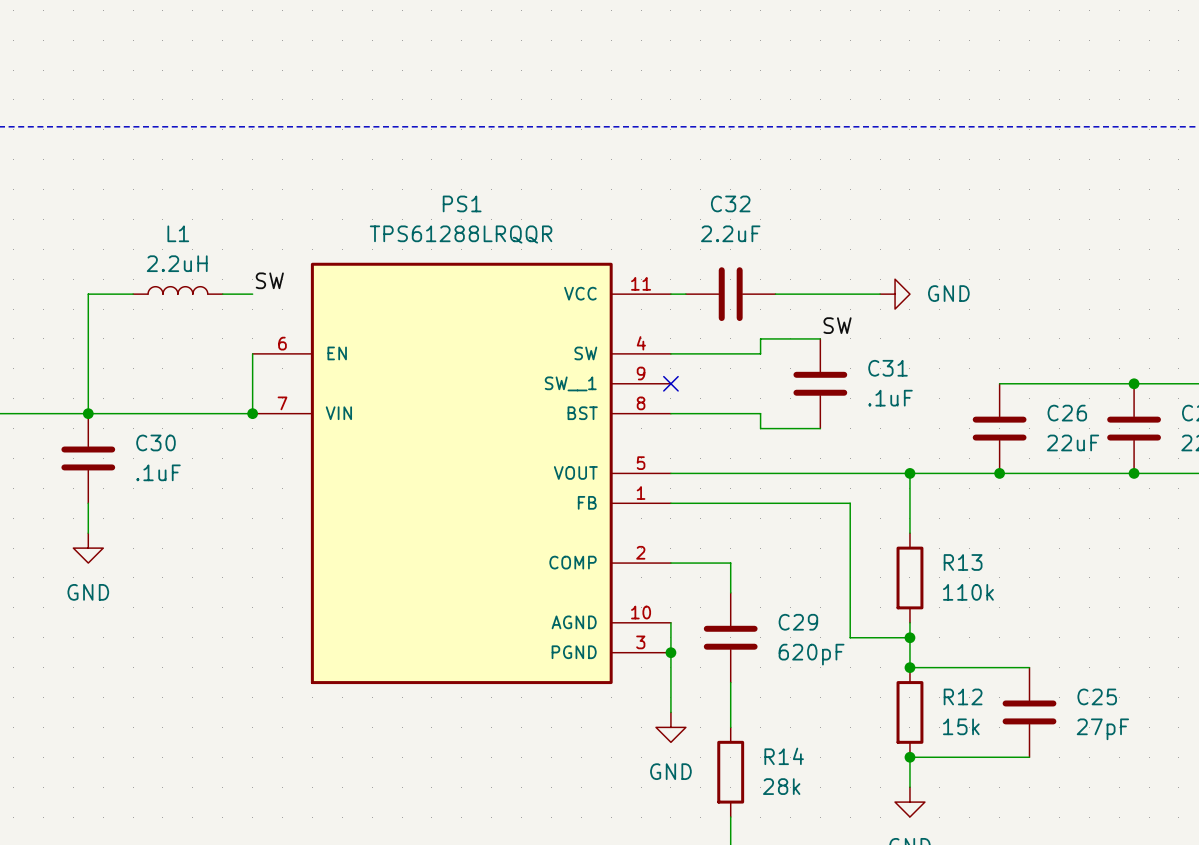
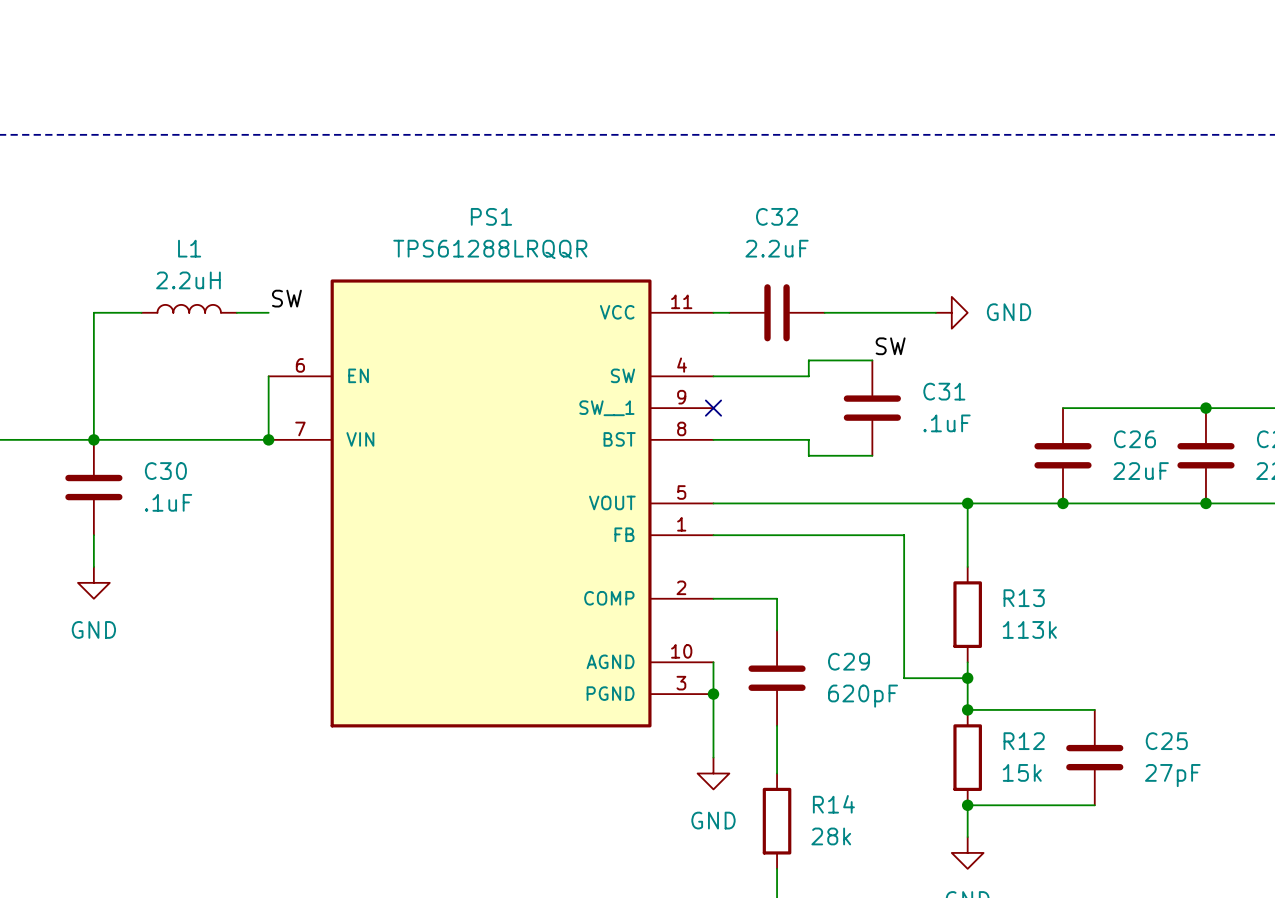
R13 value: 110k (968, 592) -> 113k (1029, 629)

